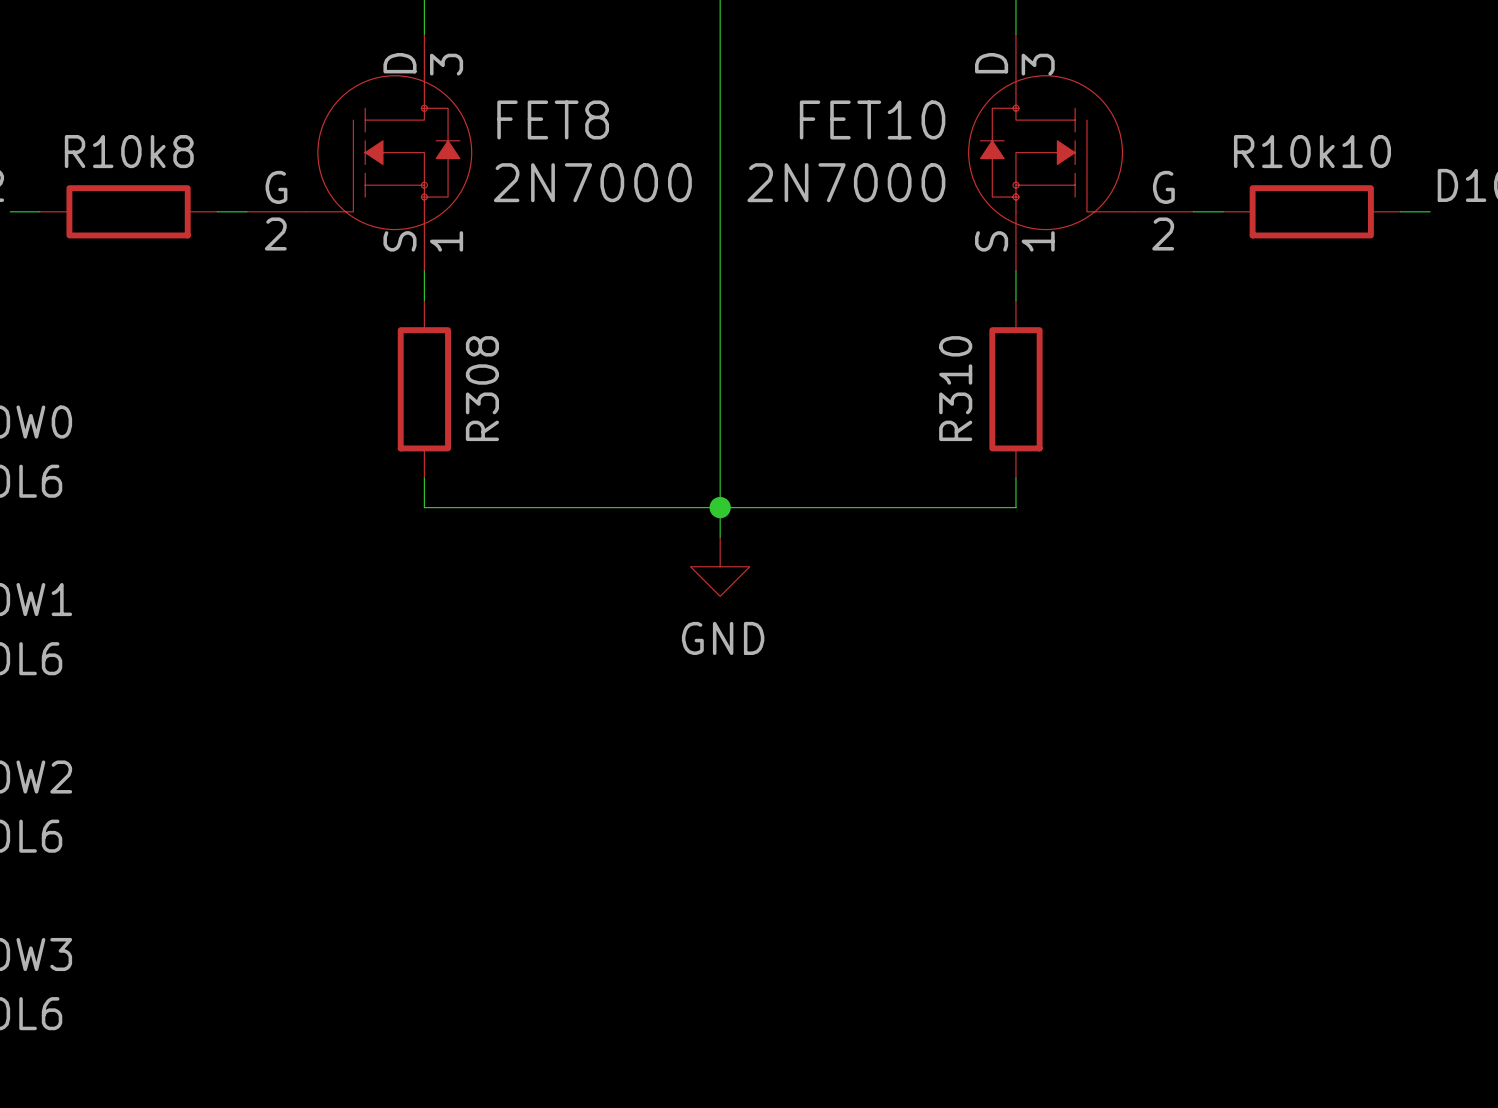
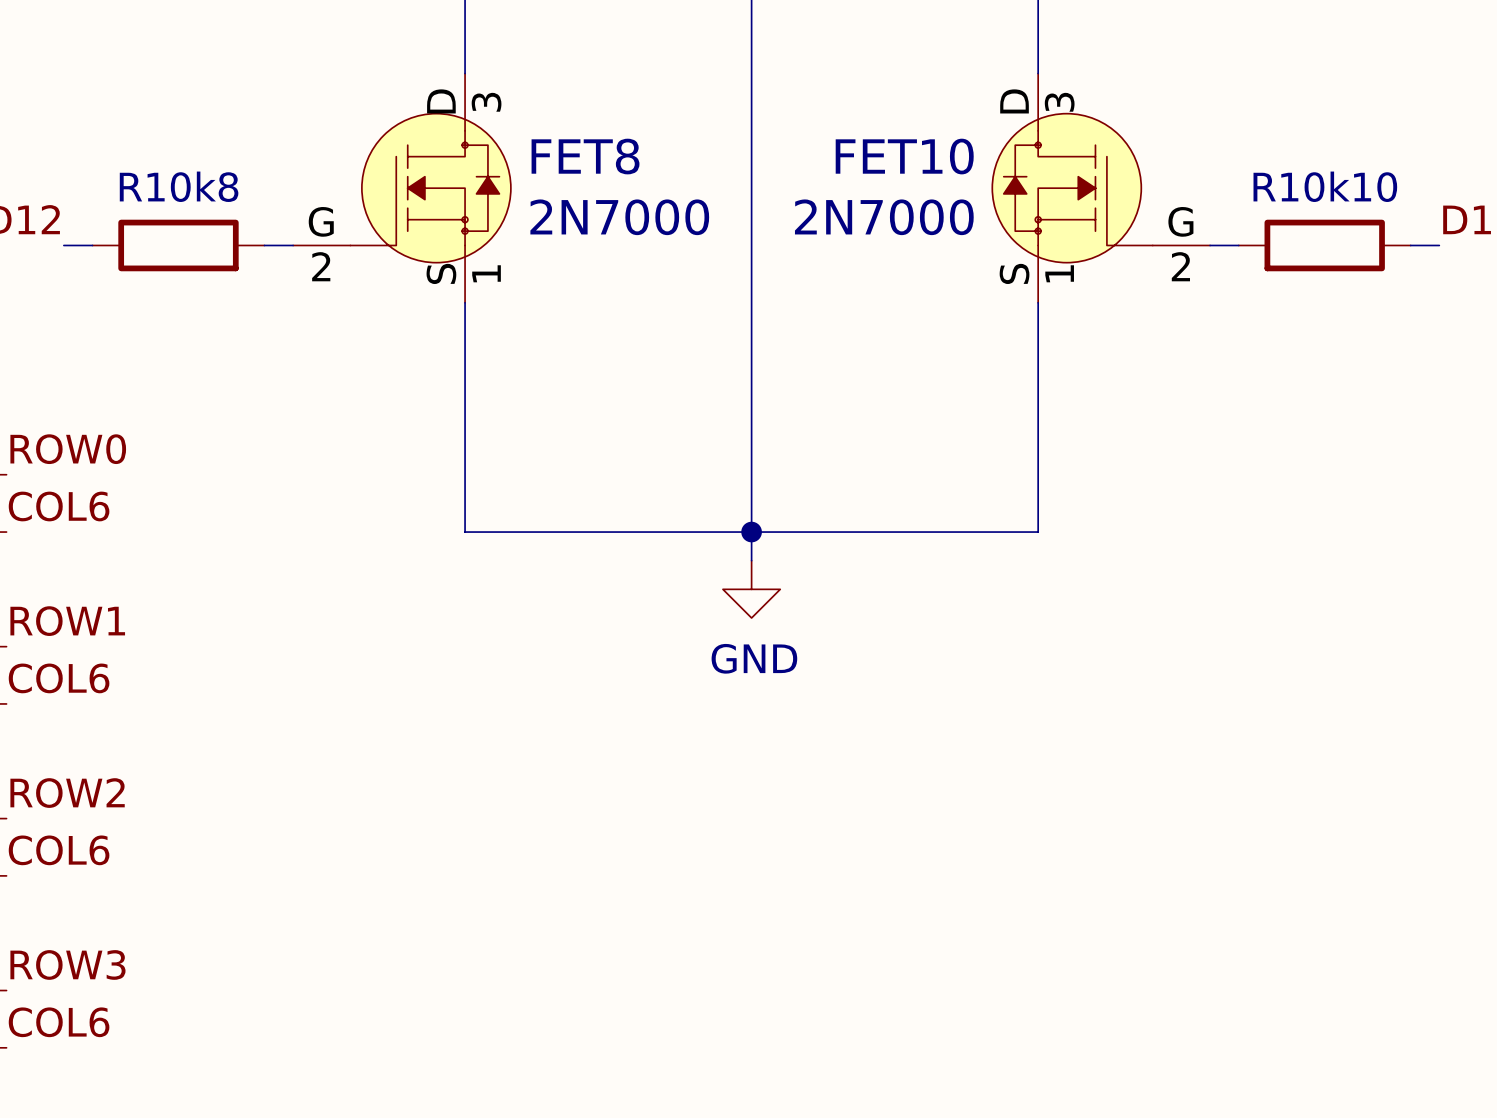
wire: none -> (465, 331) (465, 503)
wire: none -> (1038, 331) (1038, 503)
R308: (424, 389) -> none
R310: (1015, 389) -> none

